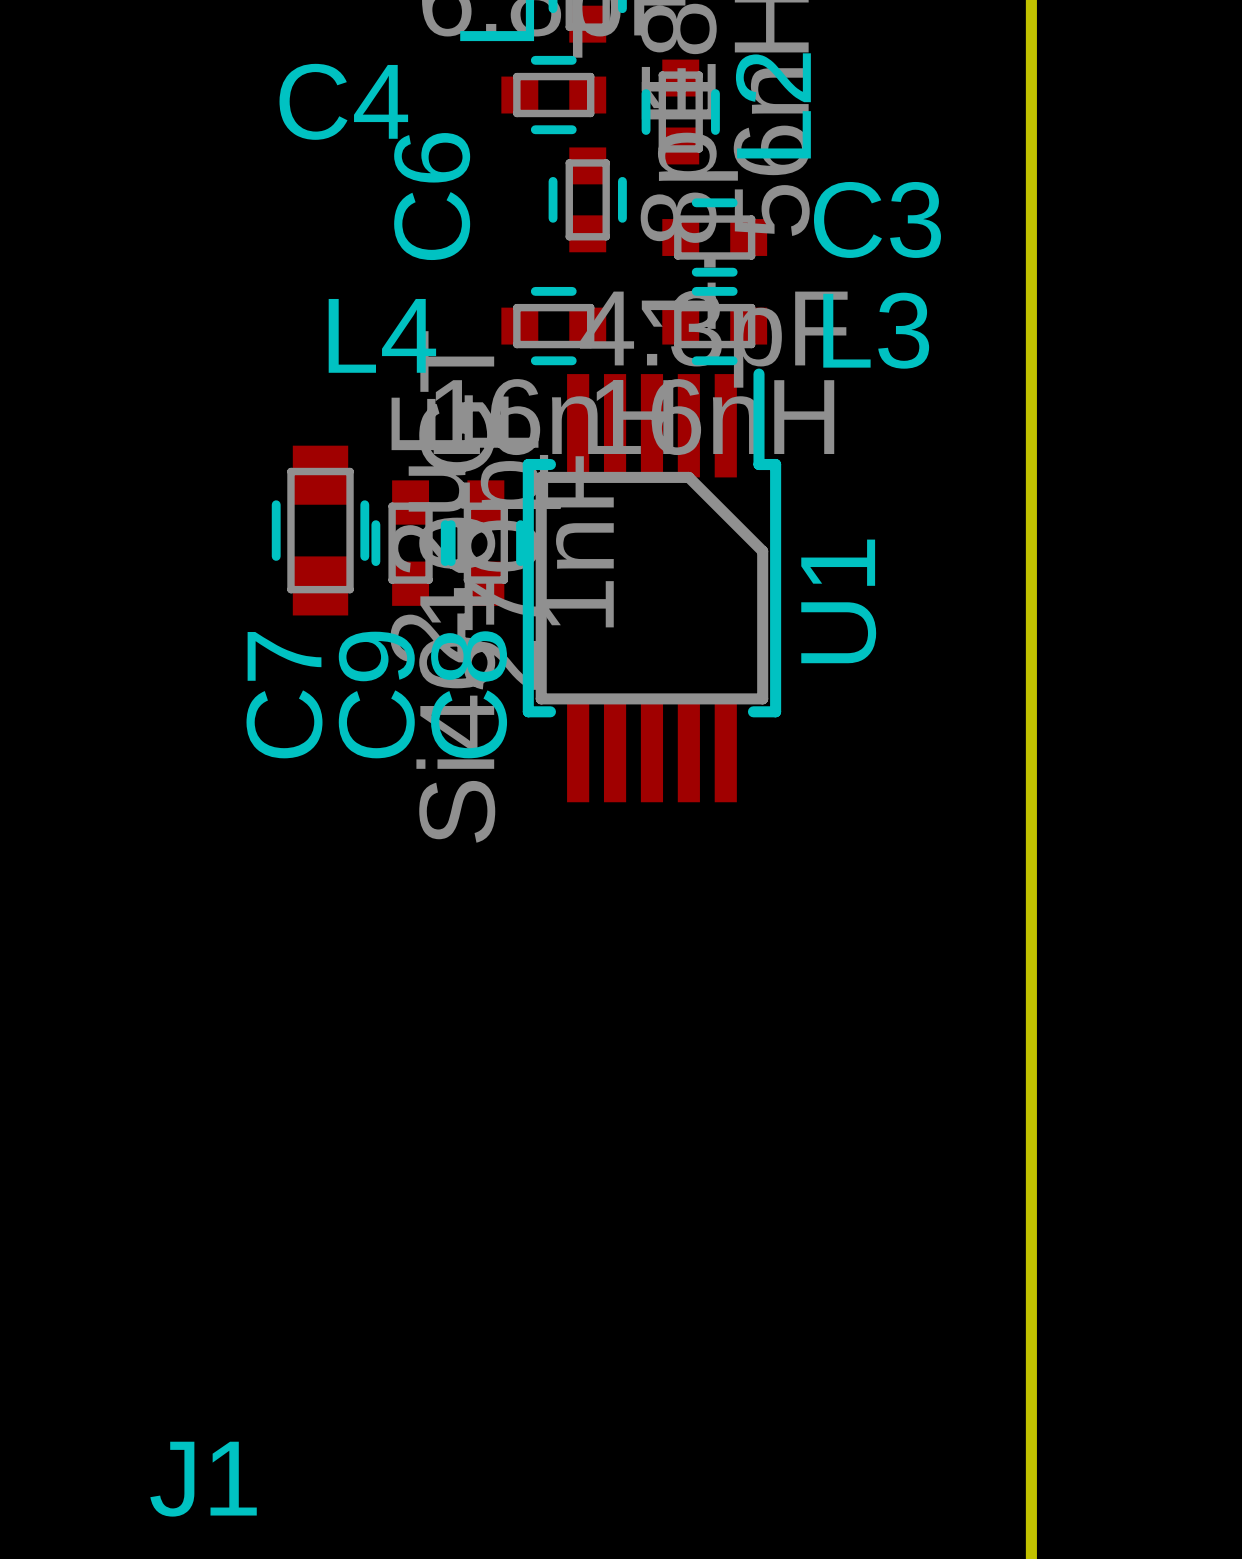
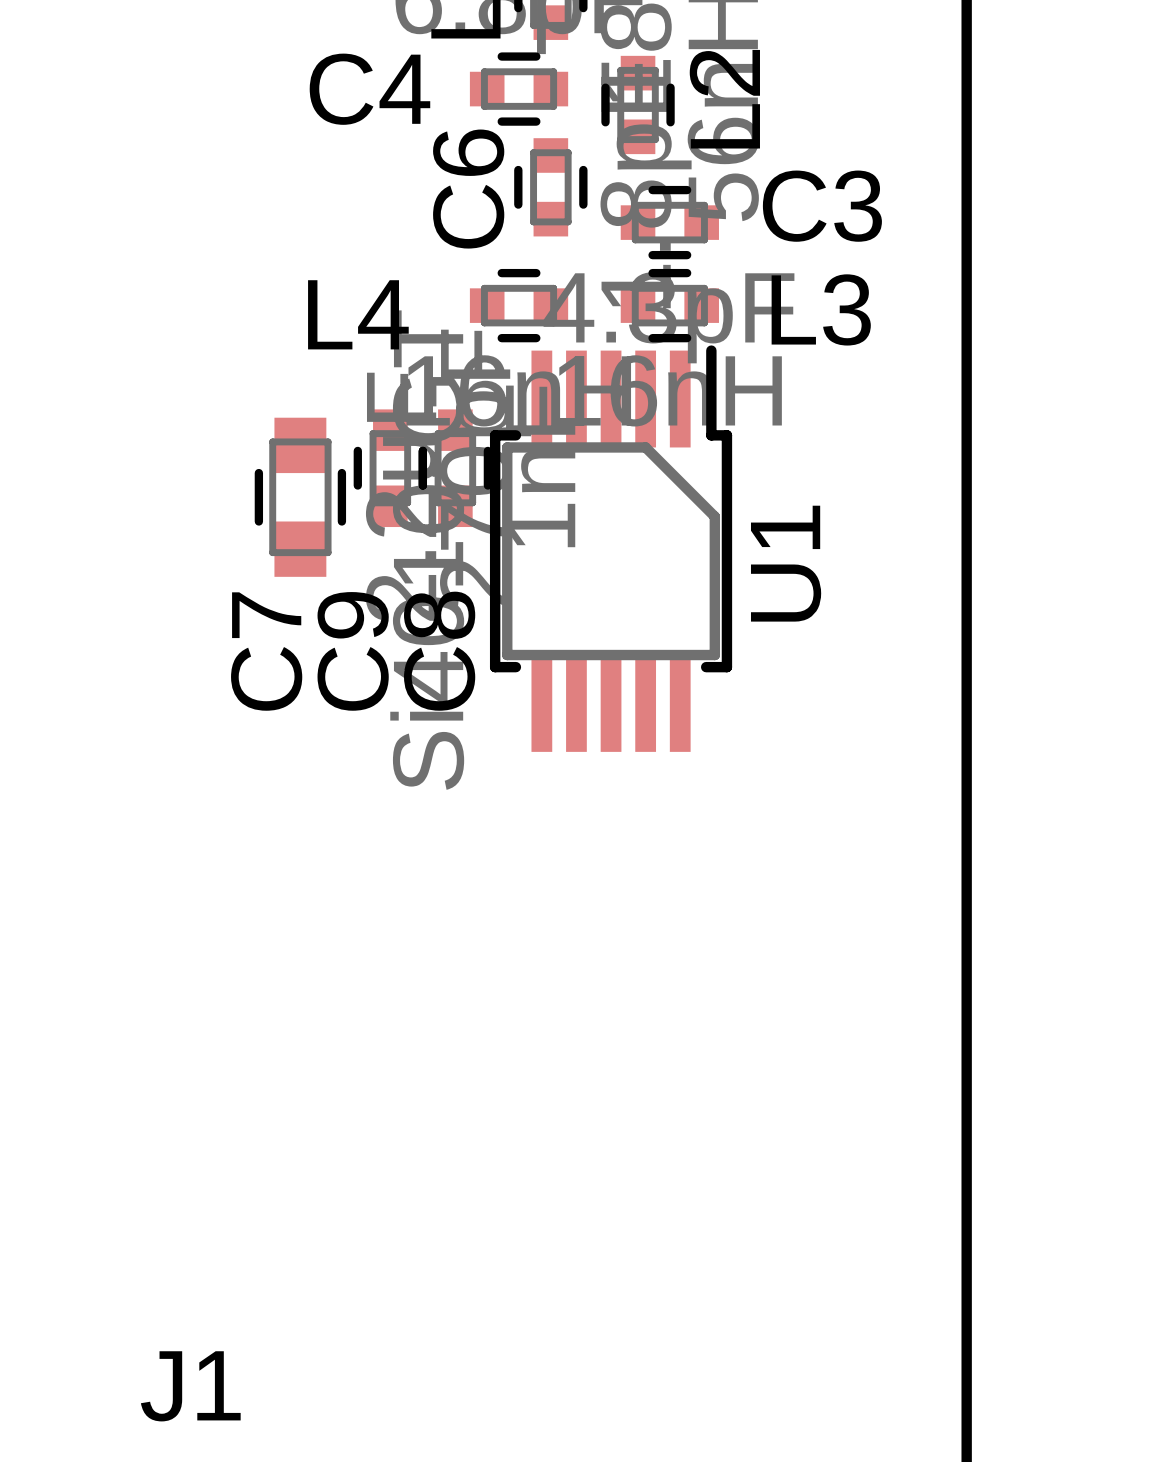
C4 name position: C4 (343, 101) -> C4 (369, 89)
C6 name position: C6 (432, 196) -> C6 (468, 189)
C9 position: (410, 543) -> (390, 468)
C8 position: (485, 543) -> (455, 468)

